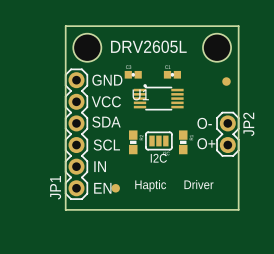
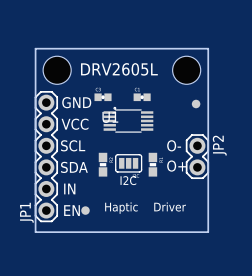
text: SDA (106, 122) -> SCL (73, 145)
text: SCL (106, 145) -> SDA (74, 167)

